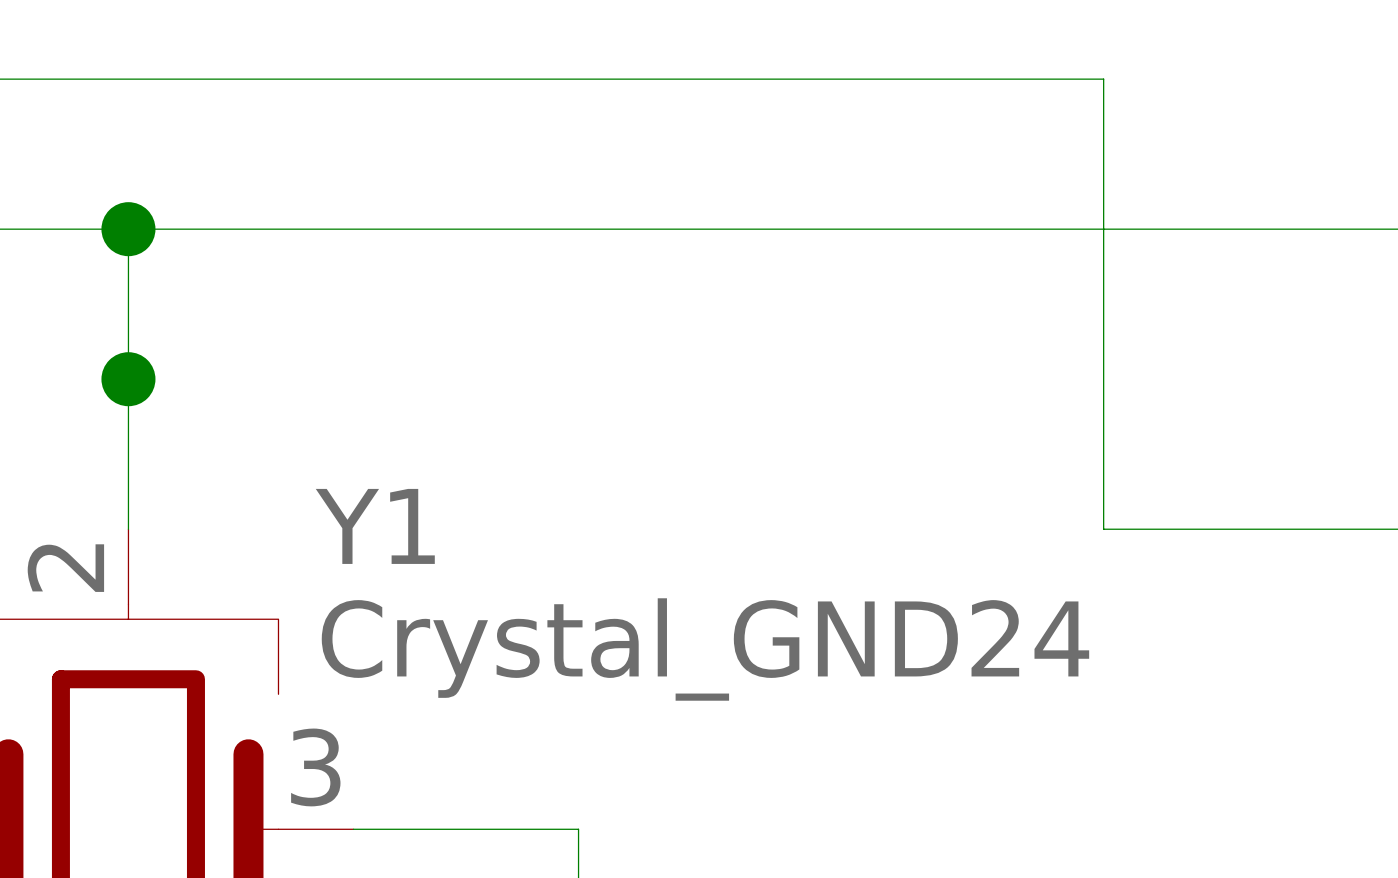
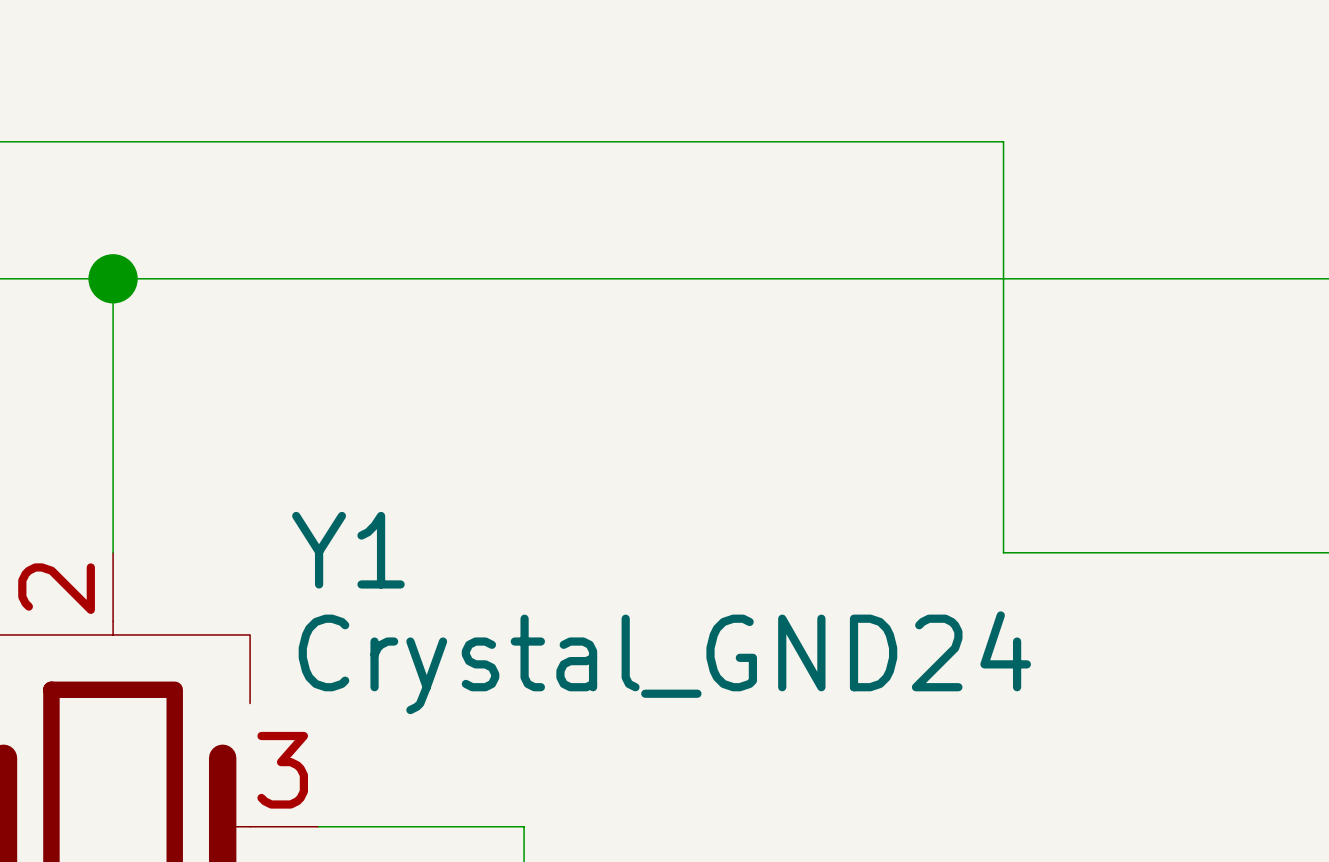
junction: (128, 379) -> none

